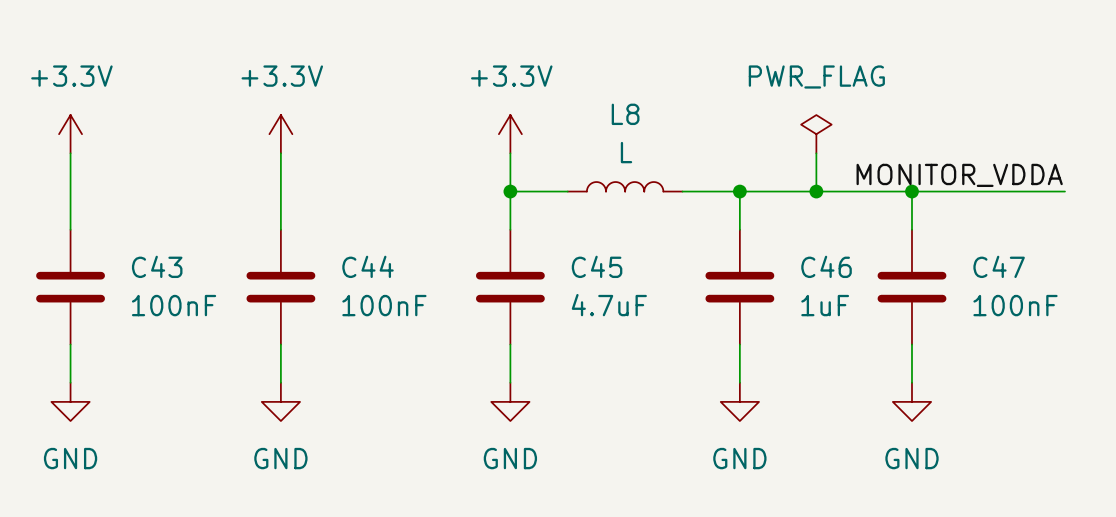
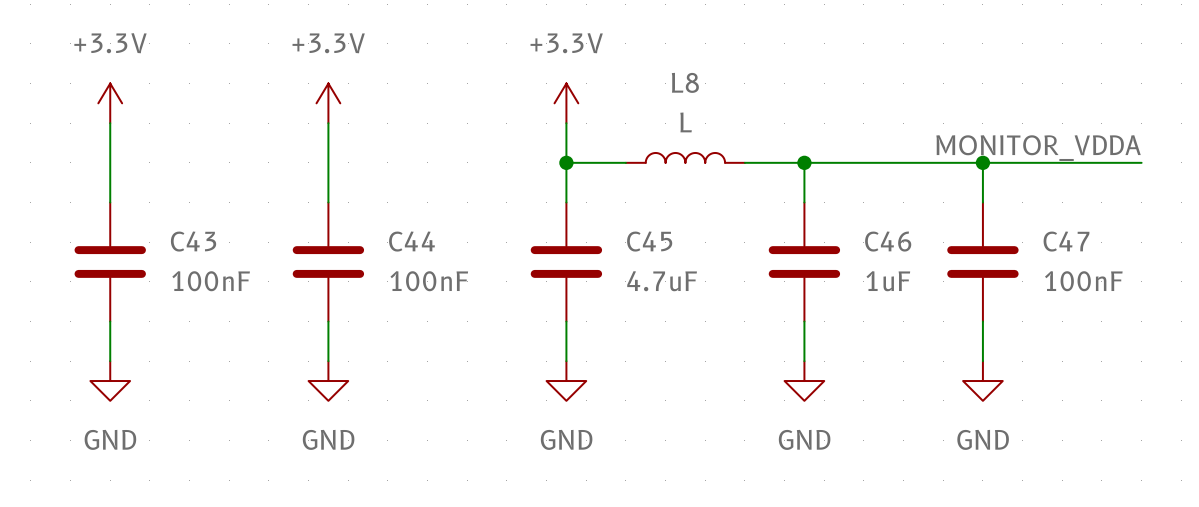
power symbol: PWR_FLAG (816, 134) -> none
wire: (816, 153) (816, 191) -> none
junction: (816, 191) -> none

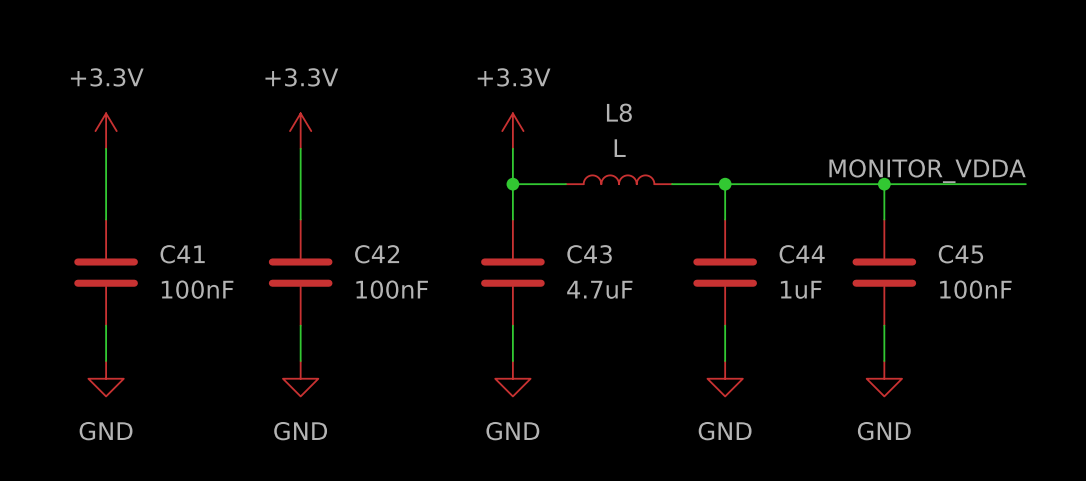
C43 name: C43 (193, 241) -> C41 (182, 254)
C44 name: C44 (411, 241) -> C42 (377, 254)
C45 name: C45 (649, 241) -> C43 (589, 254)
C46 name: C46 (888, 241) -> C44 (802, 254)
C47 name: C47 (1066, 241) -> C45 (960, 254)

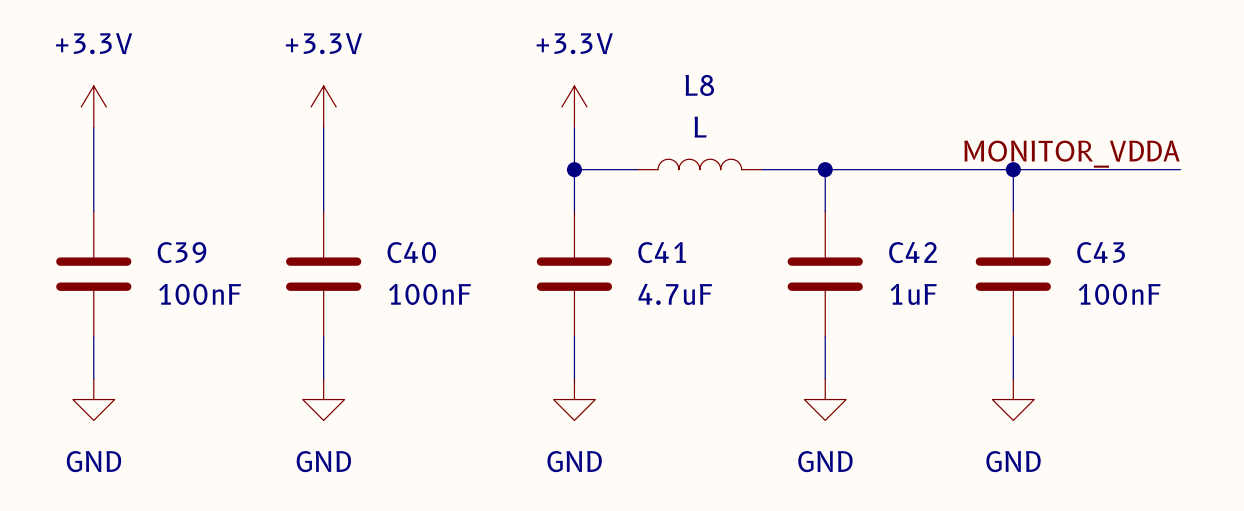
C41 name: C41 (182, 254) -> C39 (181, 252)
C42 name: C42 (377, 254) -> C40 (411, 252)
C43 name: C43 (589, 254) -> C41 (662, 252)
C44 name: C44 (802, 254) -> C42 (912, 252)
C45 name: C45 (960, 254) -> C43 (1101, 252)

